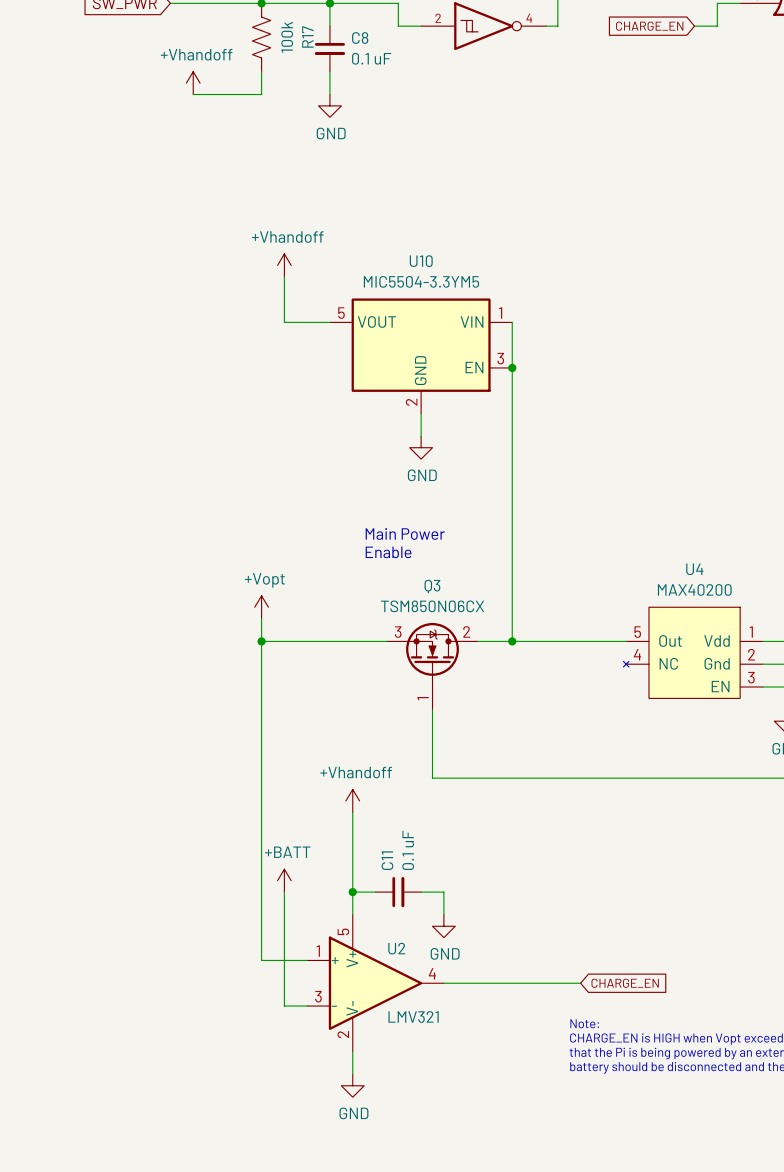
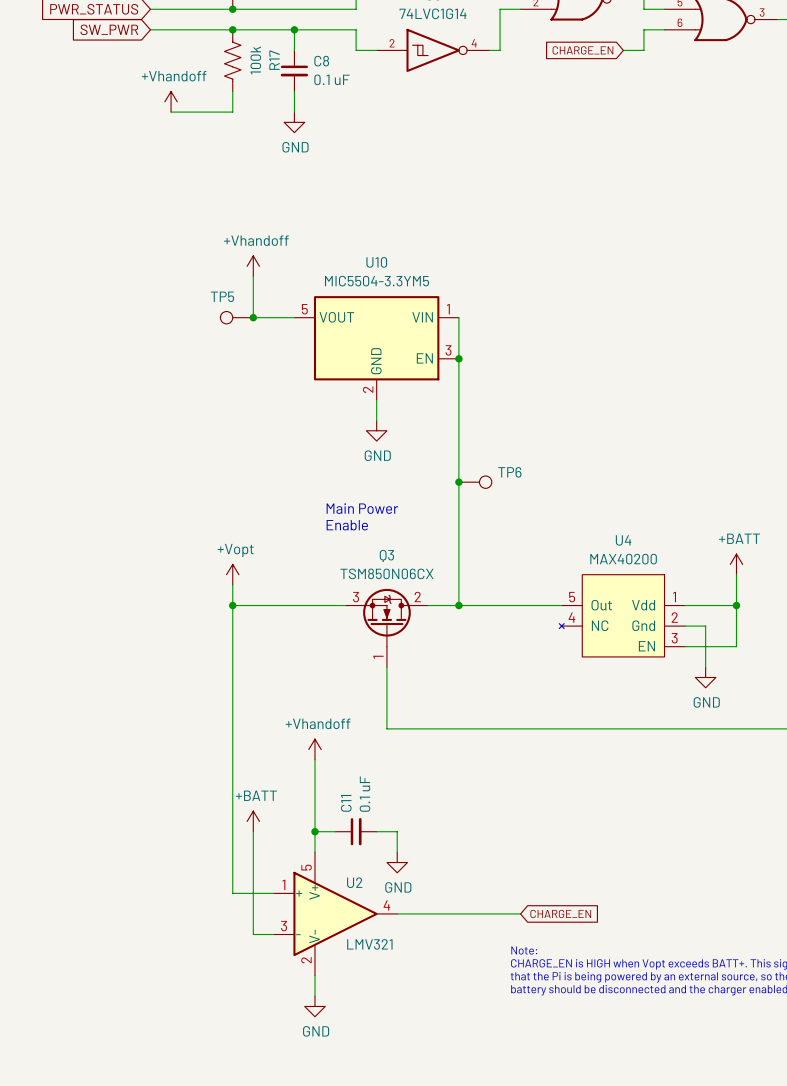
TP5: none -> (236, 317)
junction: none -> (253, 317)
junction: none -> (458, 482)
TP6: none -> (475, 482)

